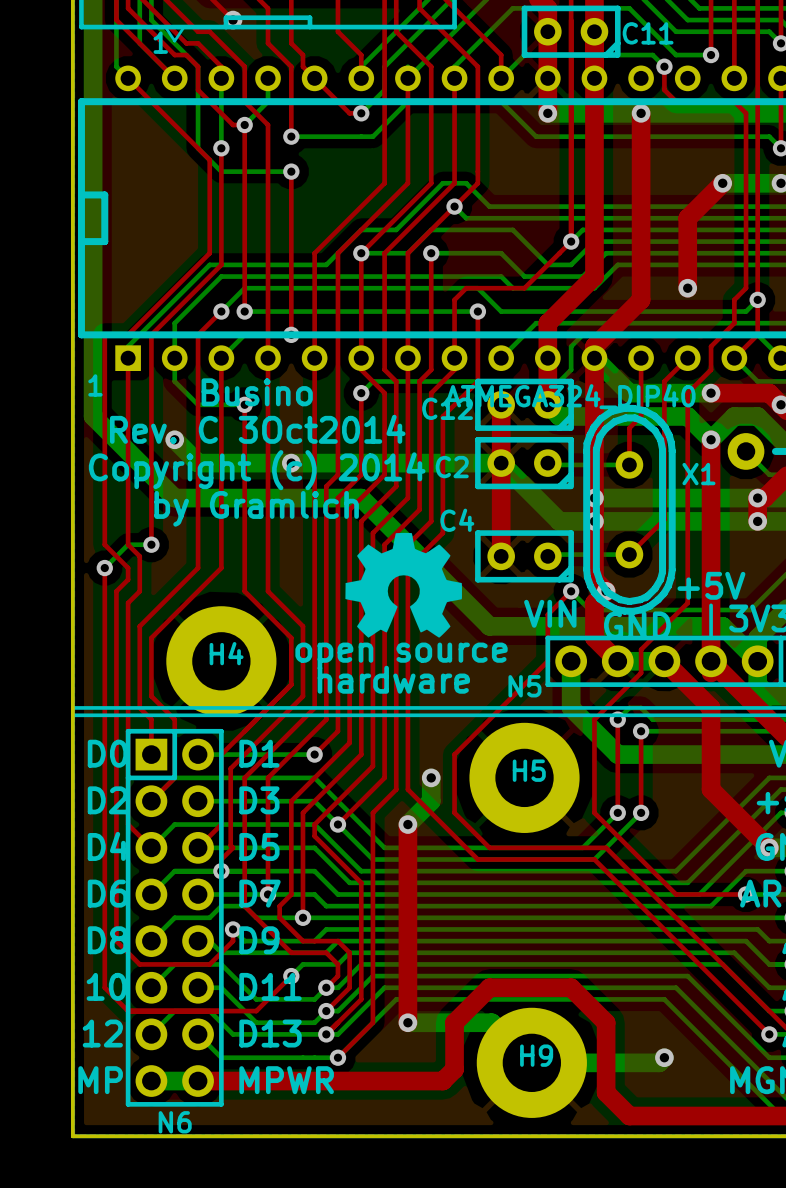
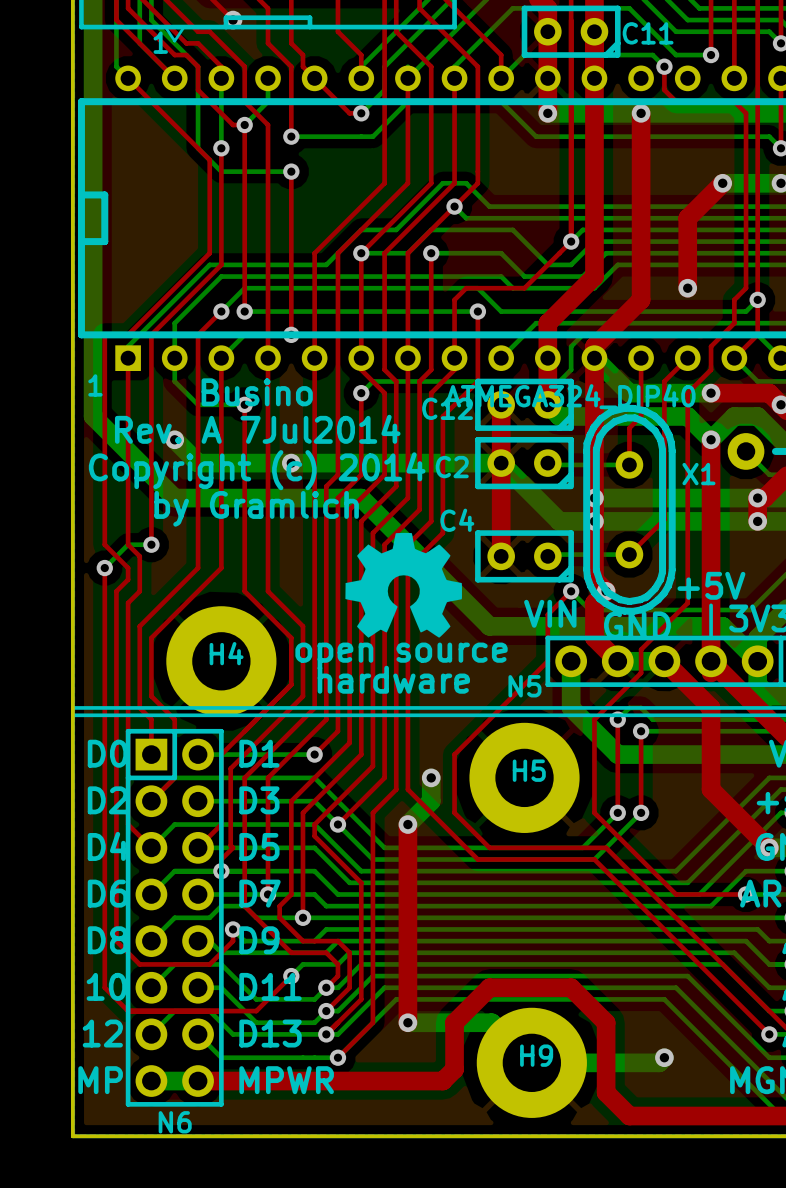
text: Rev. C 3Oct2014 (257, 429) -> Rev. A 7Jul2014 (257, 429)

